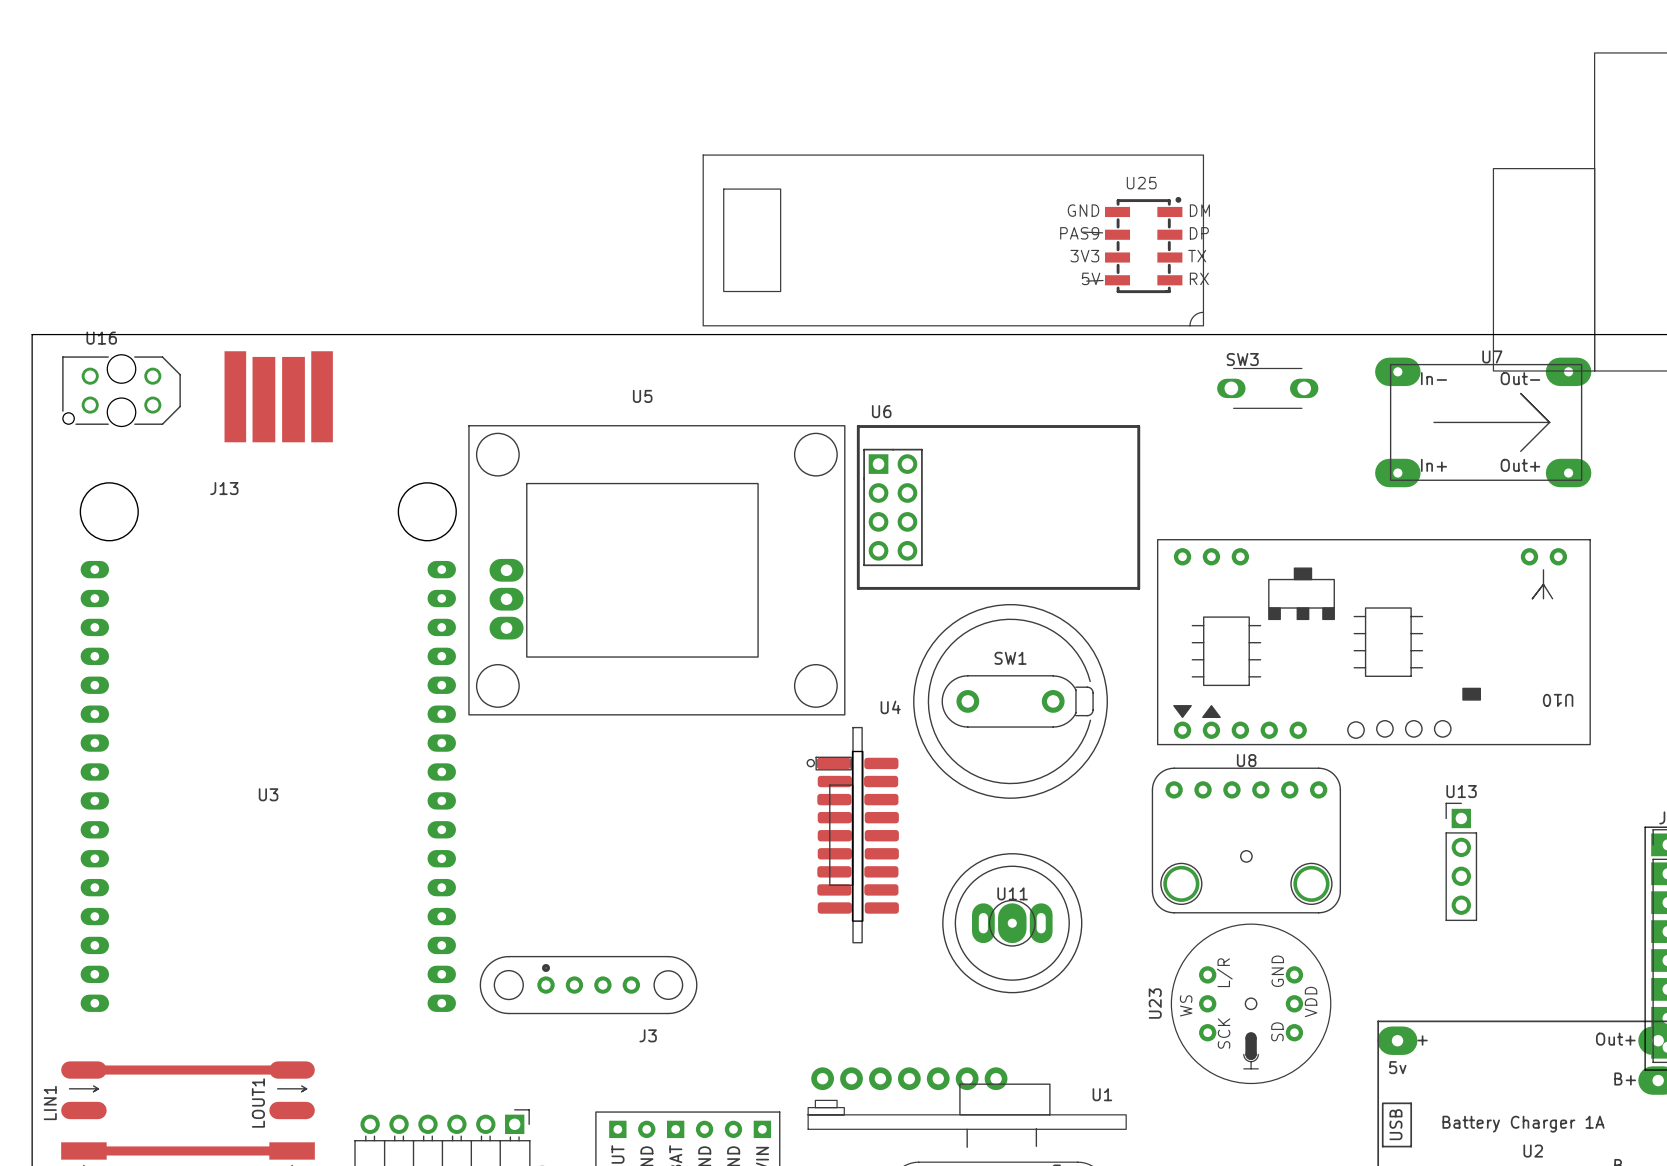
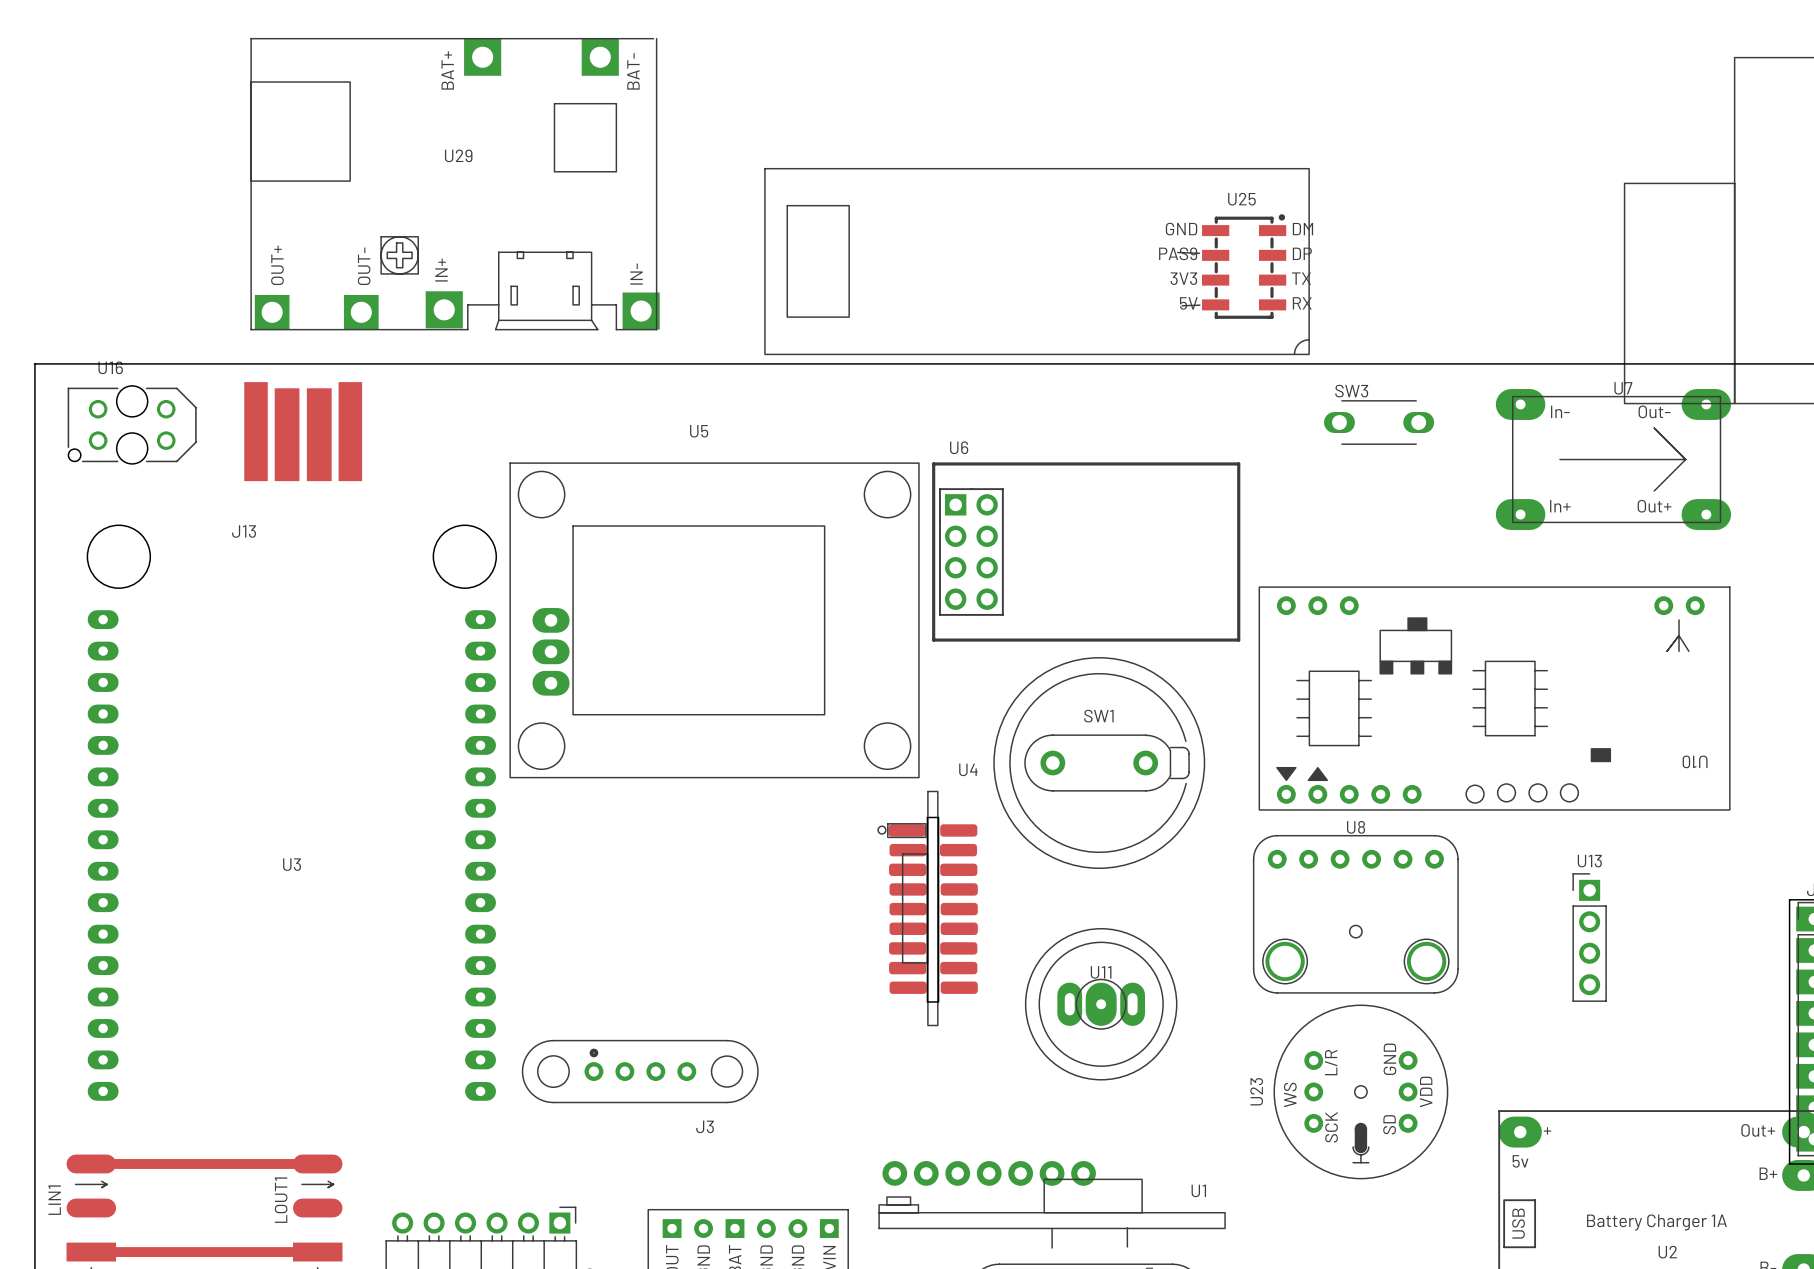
U29: none -> (455, 184)

